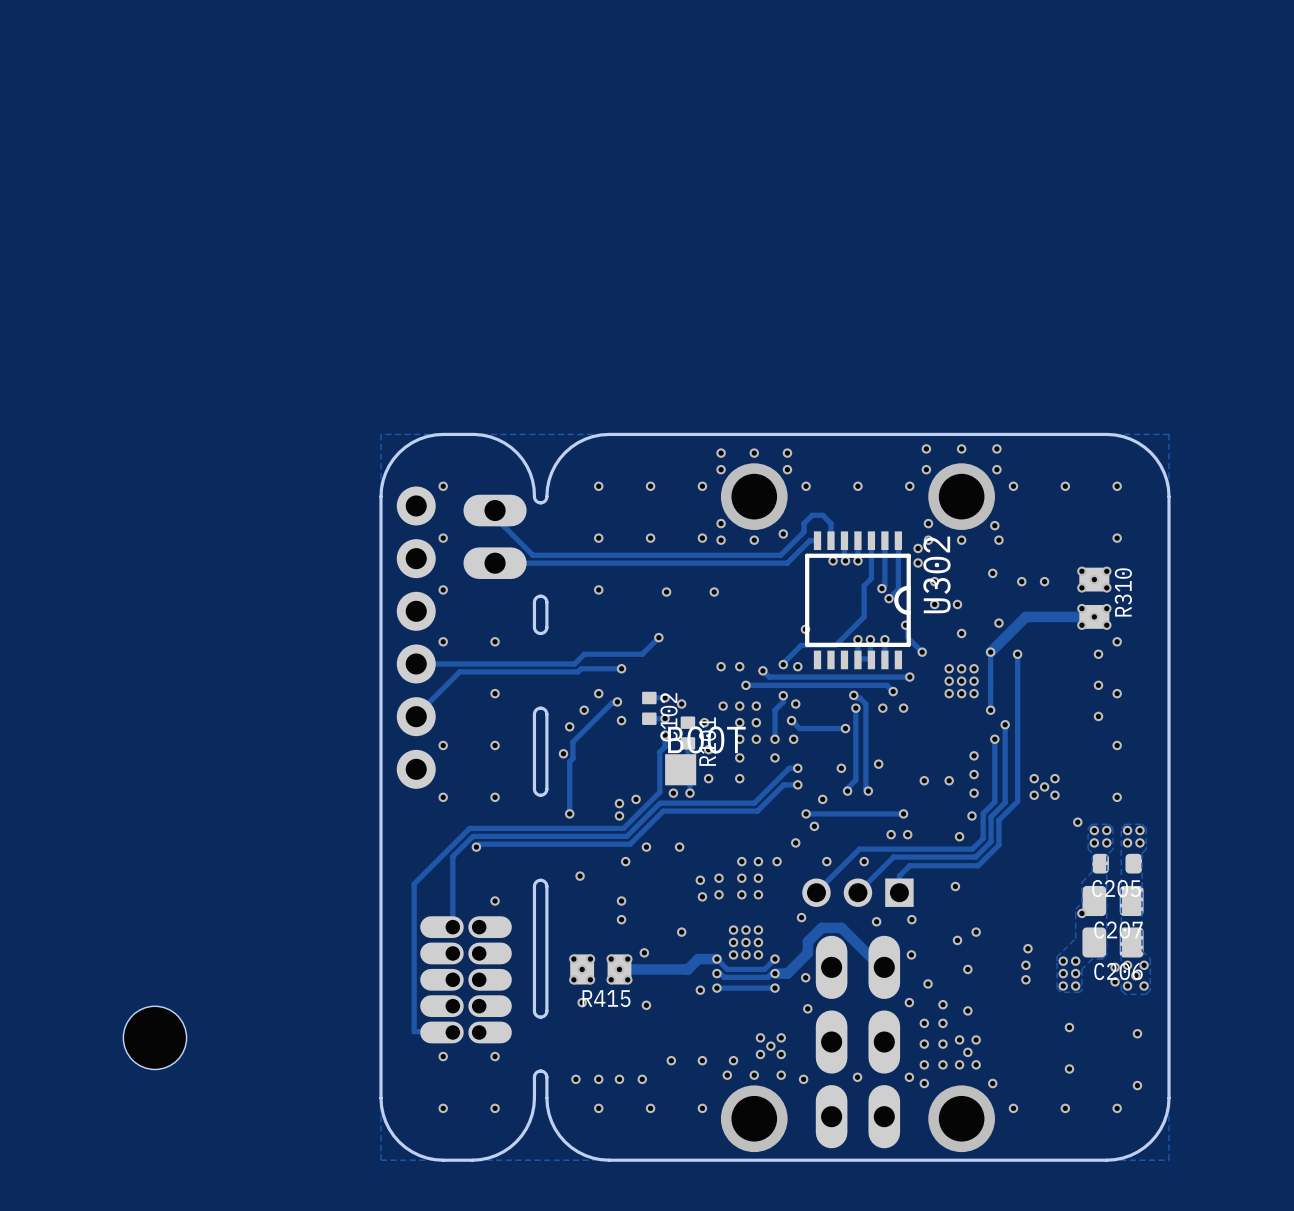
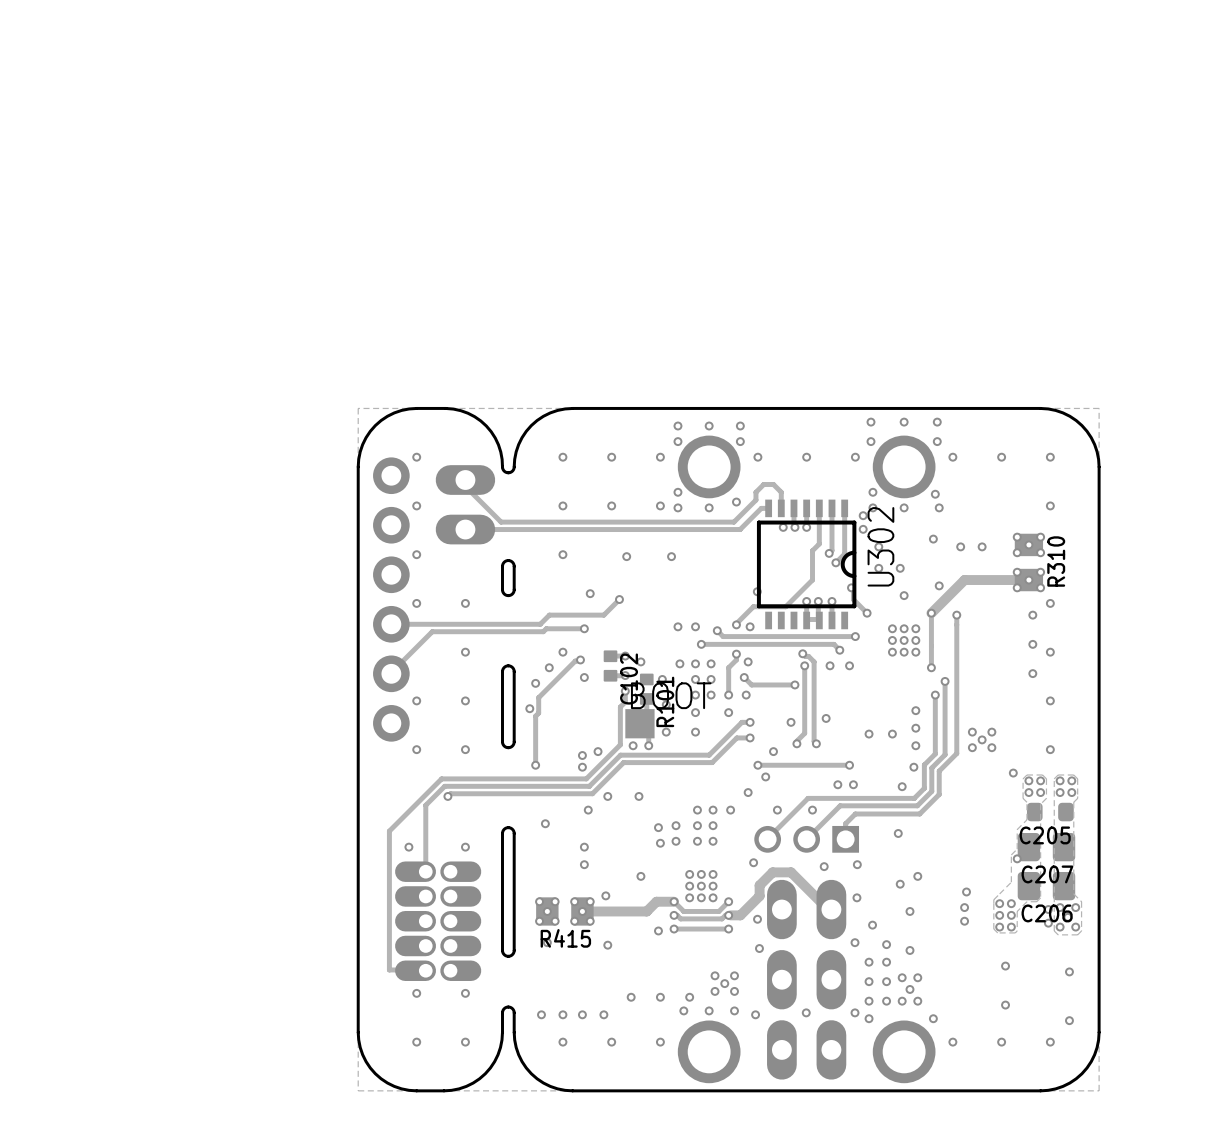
via: none -> (590, 593)
via: none -> (408, 847)
part: (154, 1037) -> none

